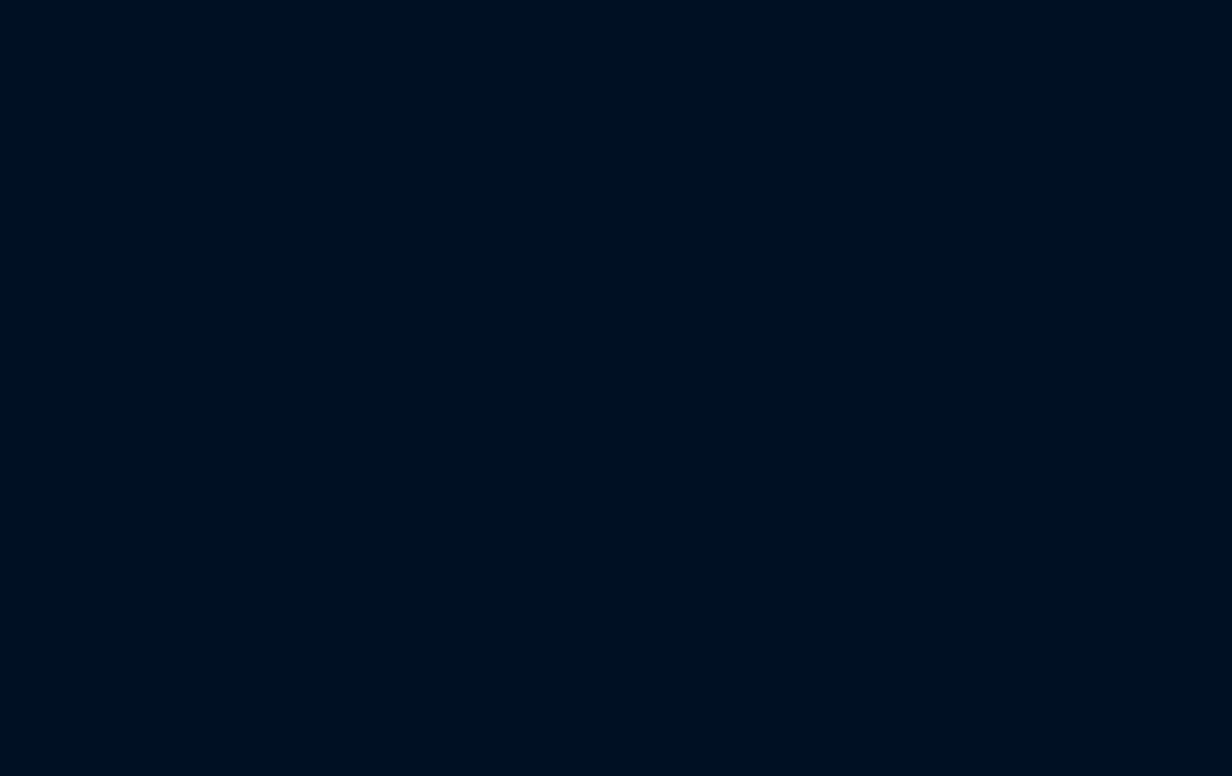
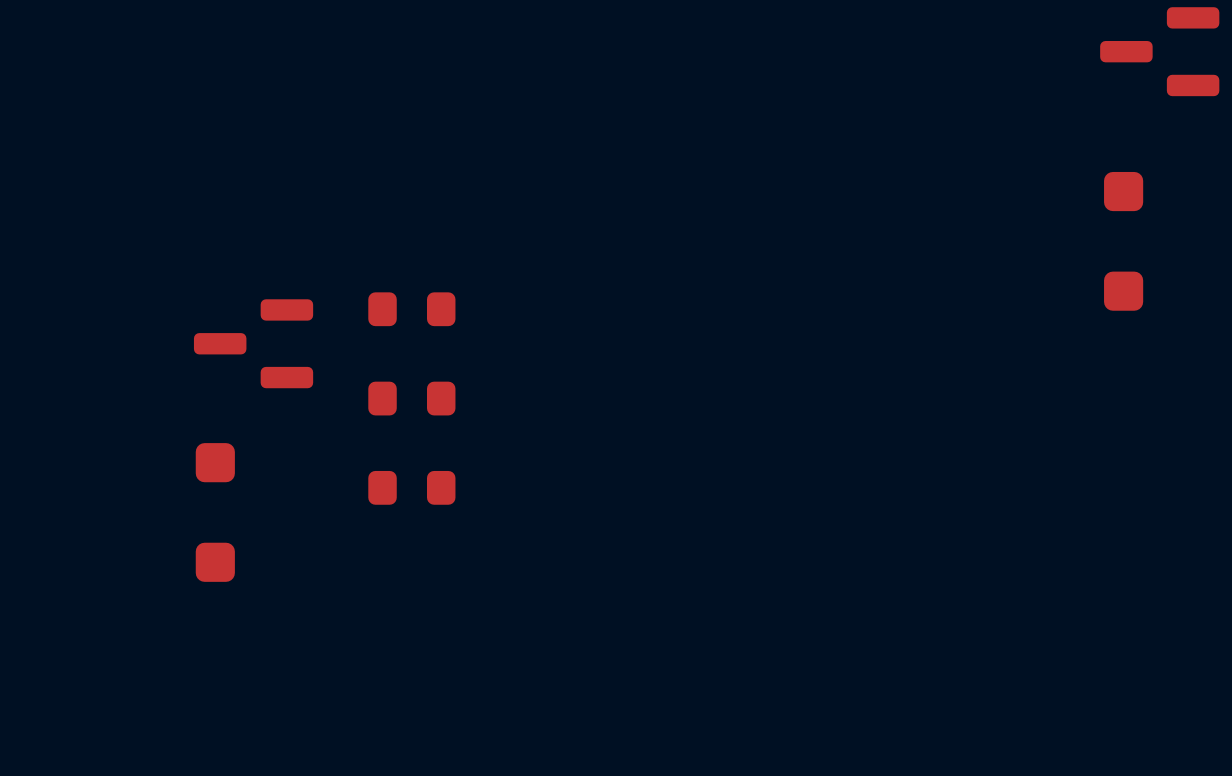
part: none -> (1159, 51)
part: none -> (1123, 241)
part: none -> (411, 309)
part: none -> (253, 343)
part: none -> (411, 398)
part: none -> (411, 487)
part: none -> (215, 512)

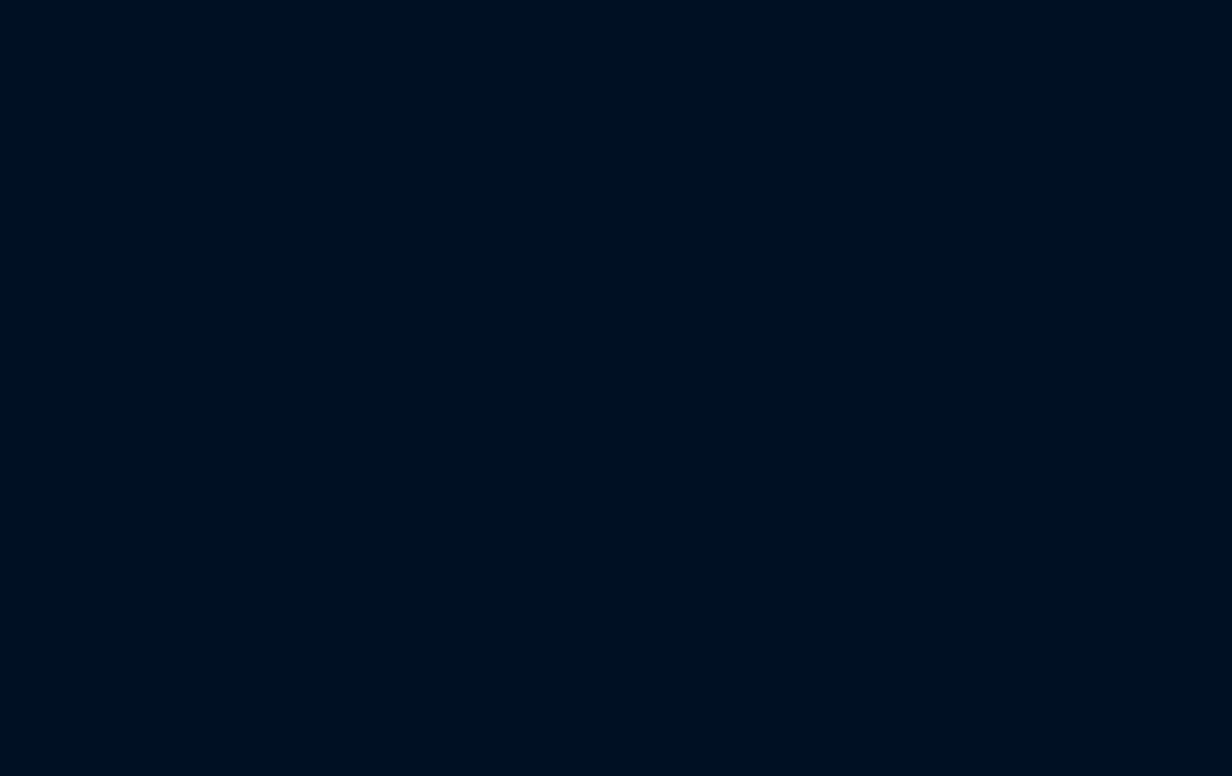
part: (1159, 51) -> none
part: (1123, 241) -> none
part: (411, 309) -> none
part: (253, 343) -> none
part: (411, 398) -> none
part: (411, 487) -> none
part: (215, 512) -> none

